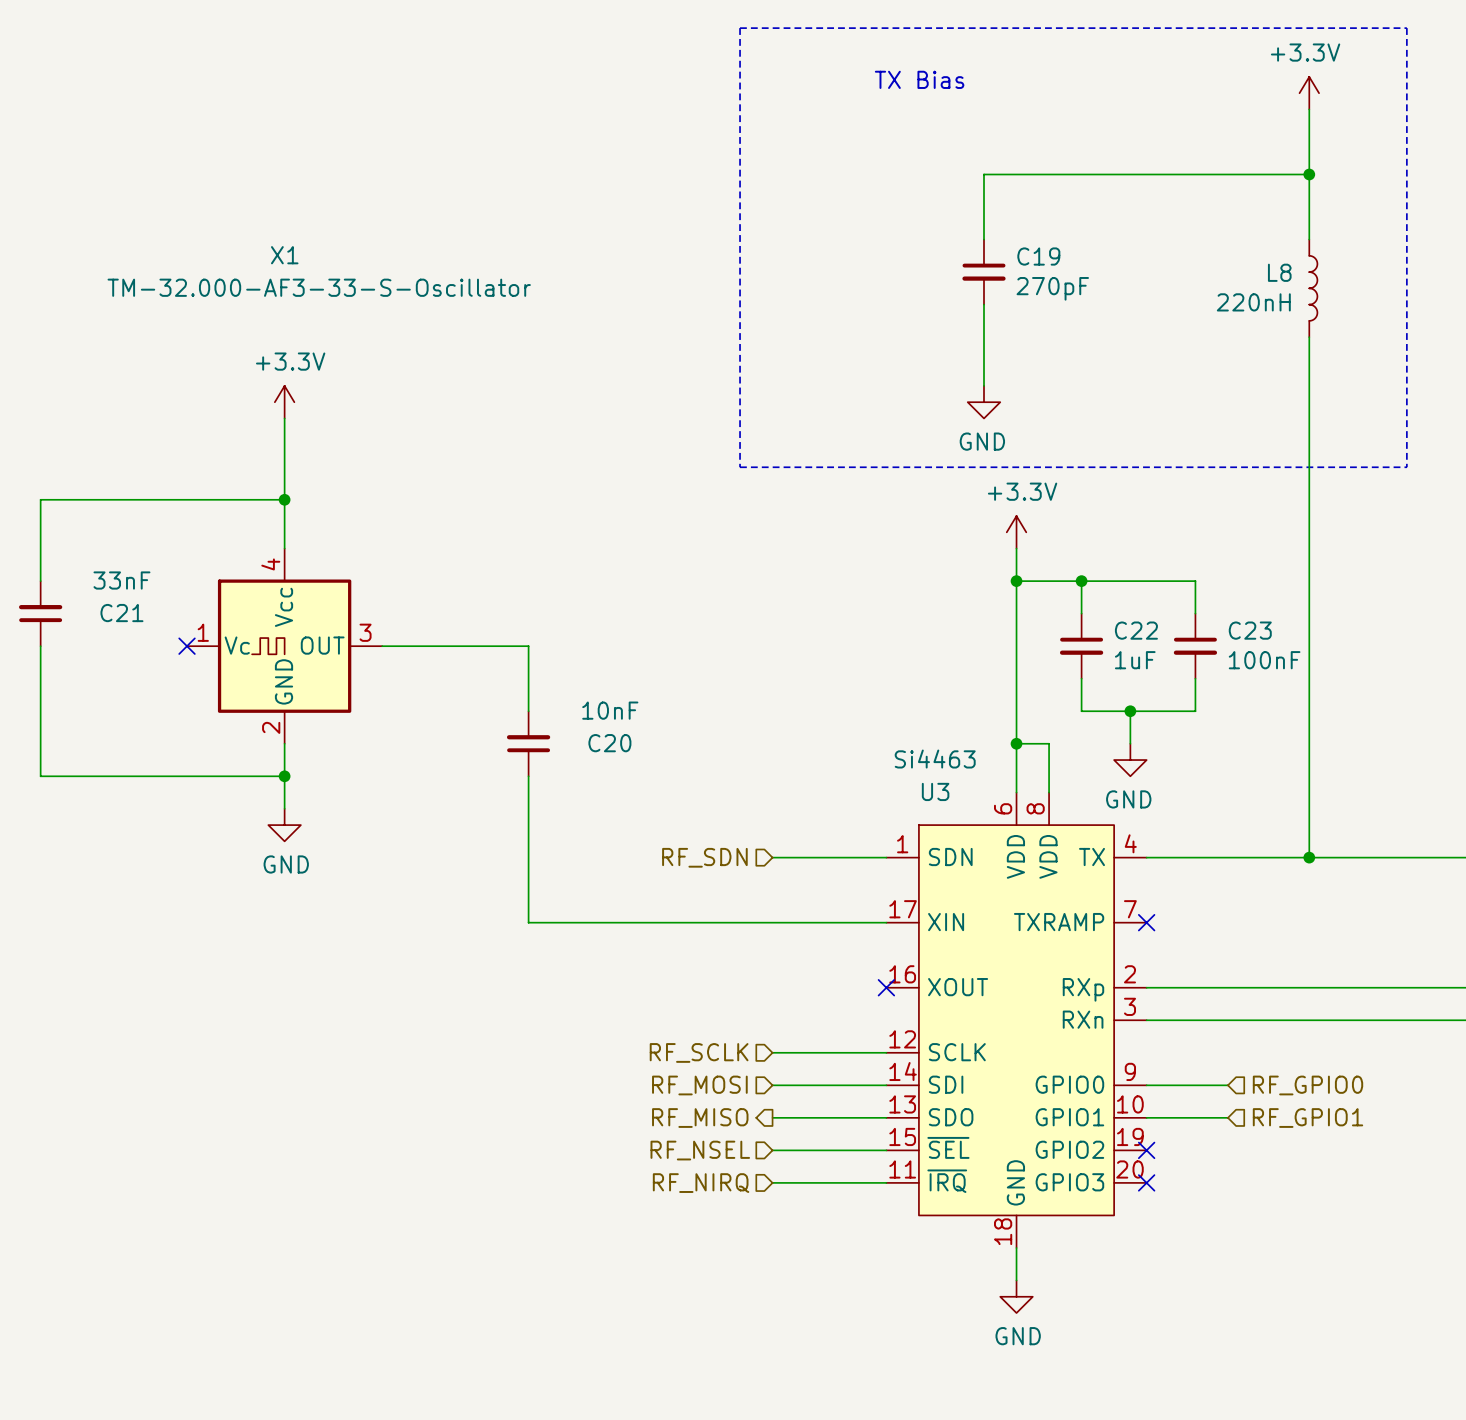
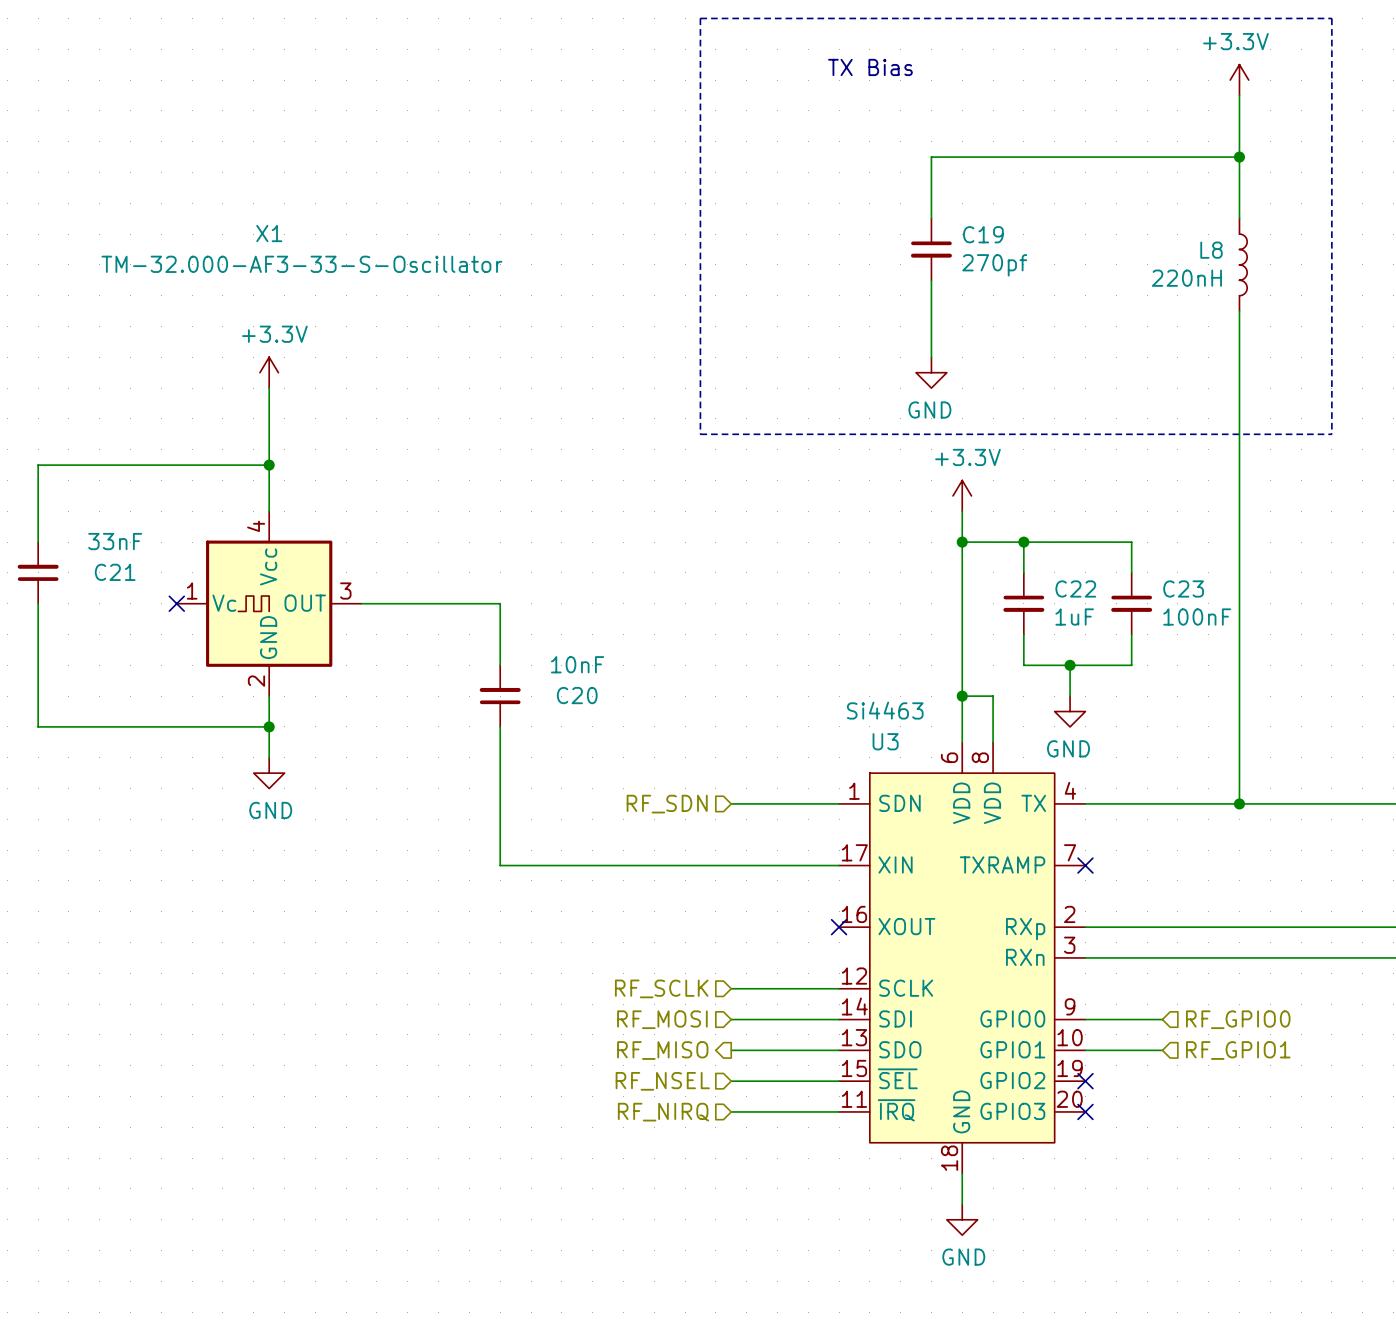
C19 value: 270pF (1052, 288) -> 270pf (994, 265)

